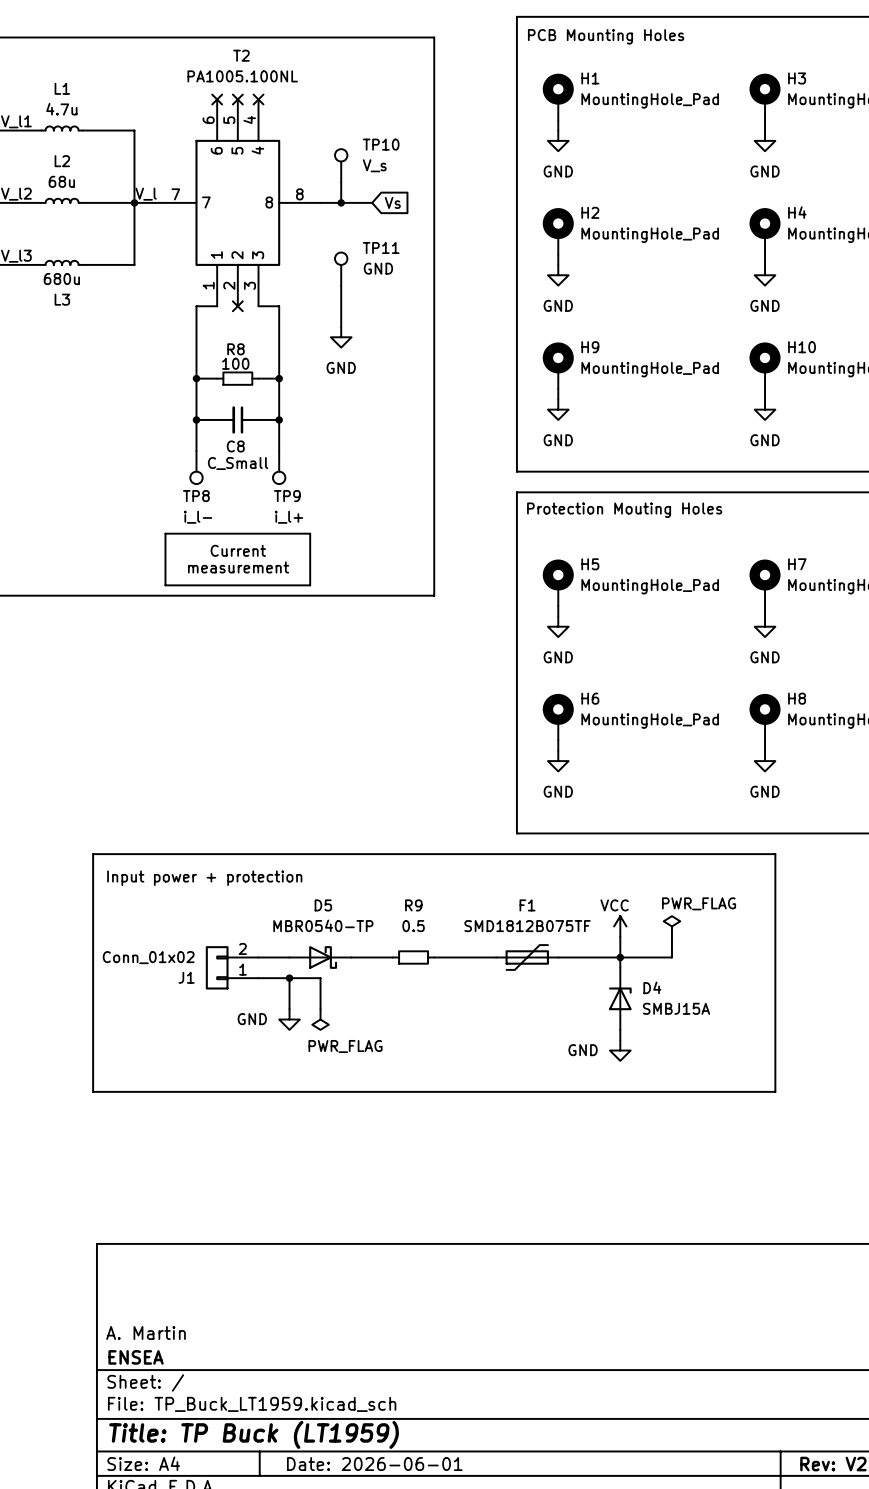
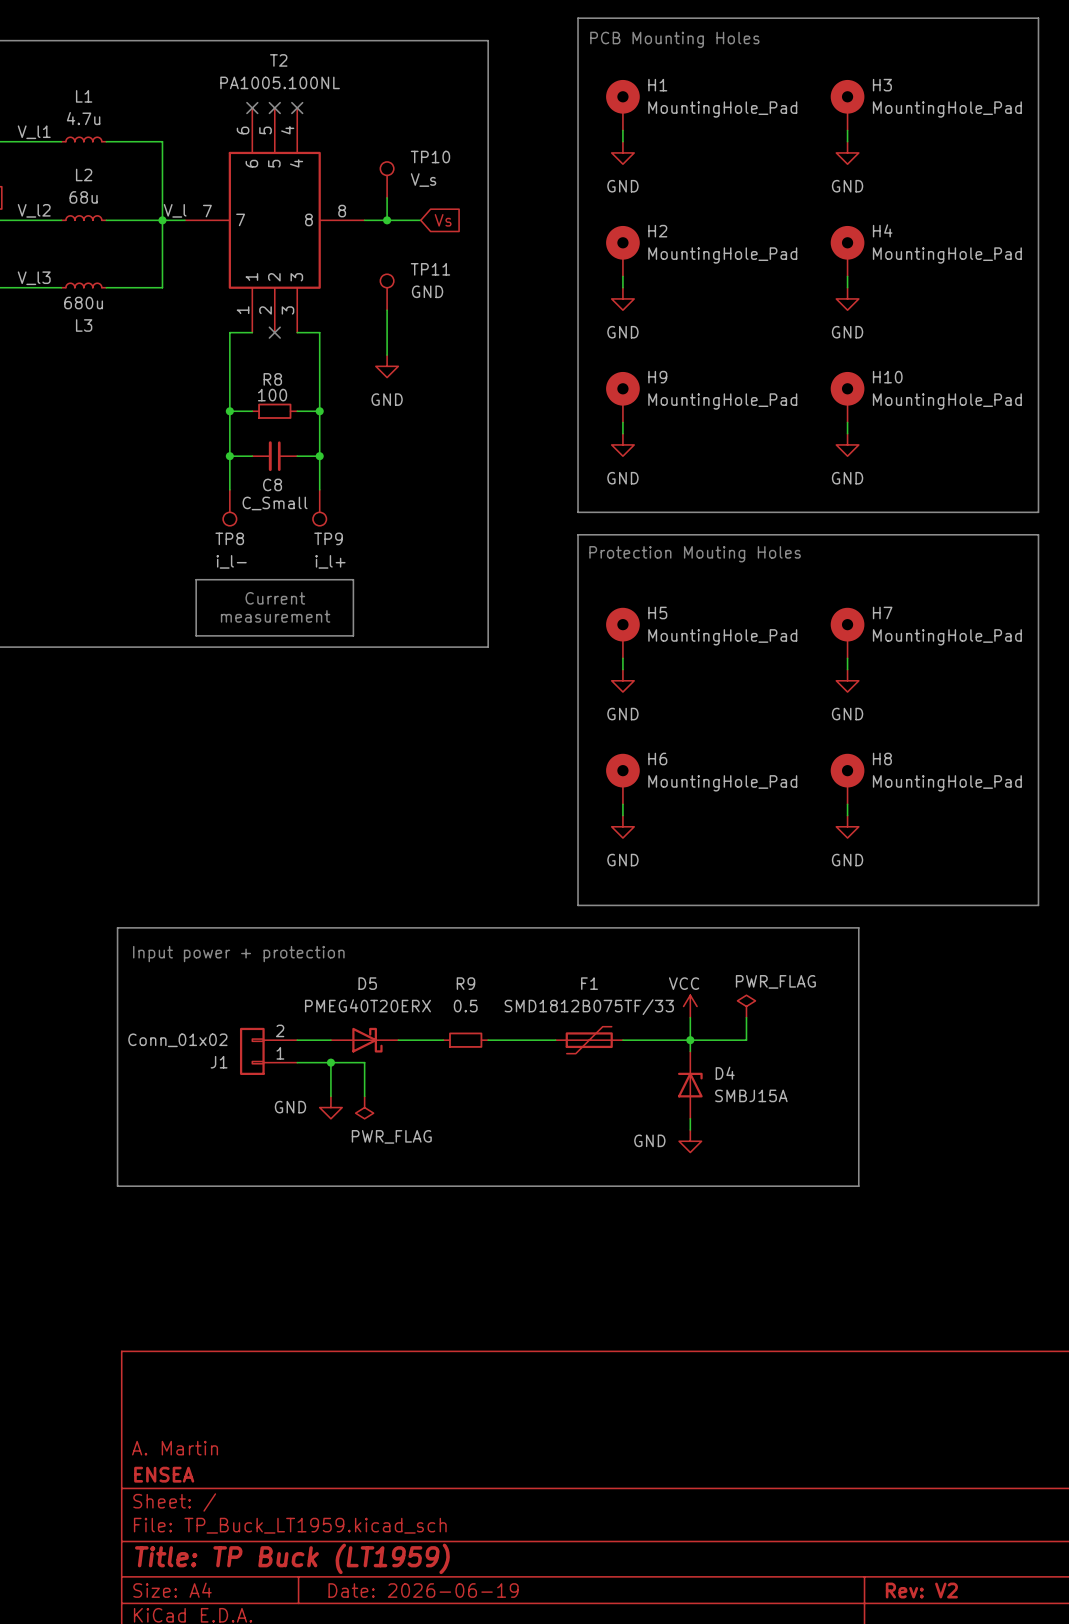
D5 value: MBR0540-TP (323, 925) -> PMEG40T20ERX (367, 1005)
F1 value: SMD1812B075TF (527, 926) -> SMD1812B075TF/33 (589, 1007)
title block: Date: 2026-06-01 (374, 1464) -> Date: 2026-06-19 (423, 1590)

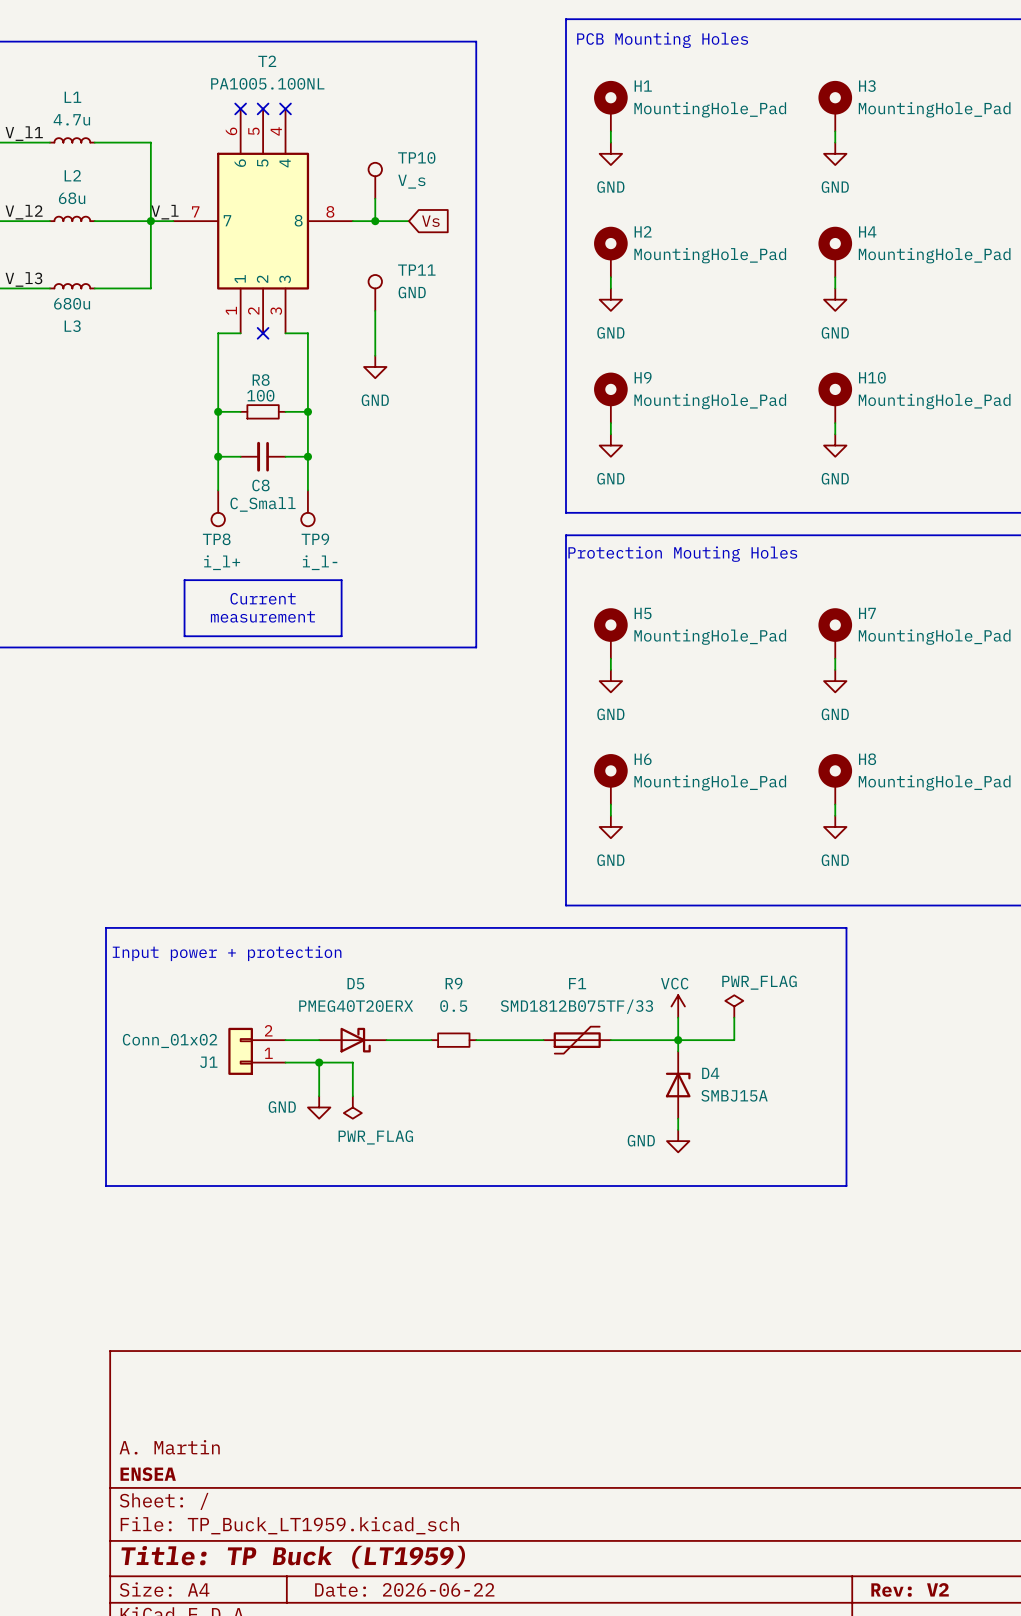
TP8 value: i_l- (231, 561) -> i_l+ (222, 562)
TP9 value: i_l+ (330, 561) -> i_l- (320, 562)
title block: Date: 2026-06-19 (423, 1590) -> Date: 2026-06-22 (404, 1589)

